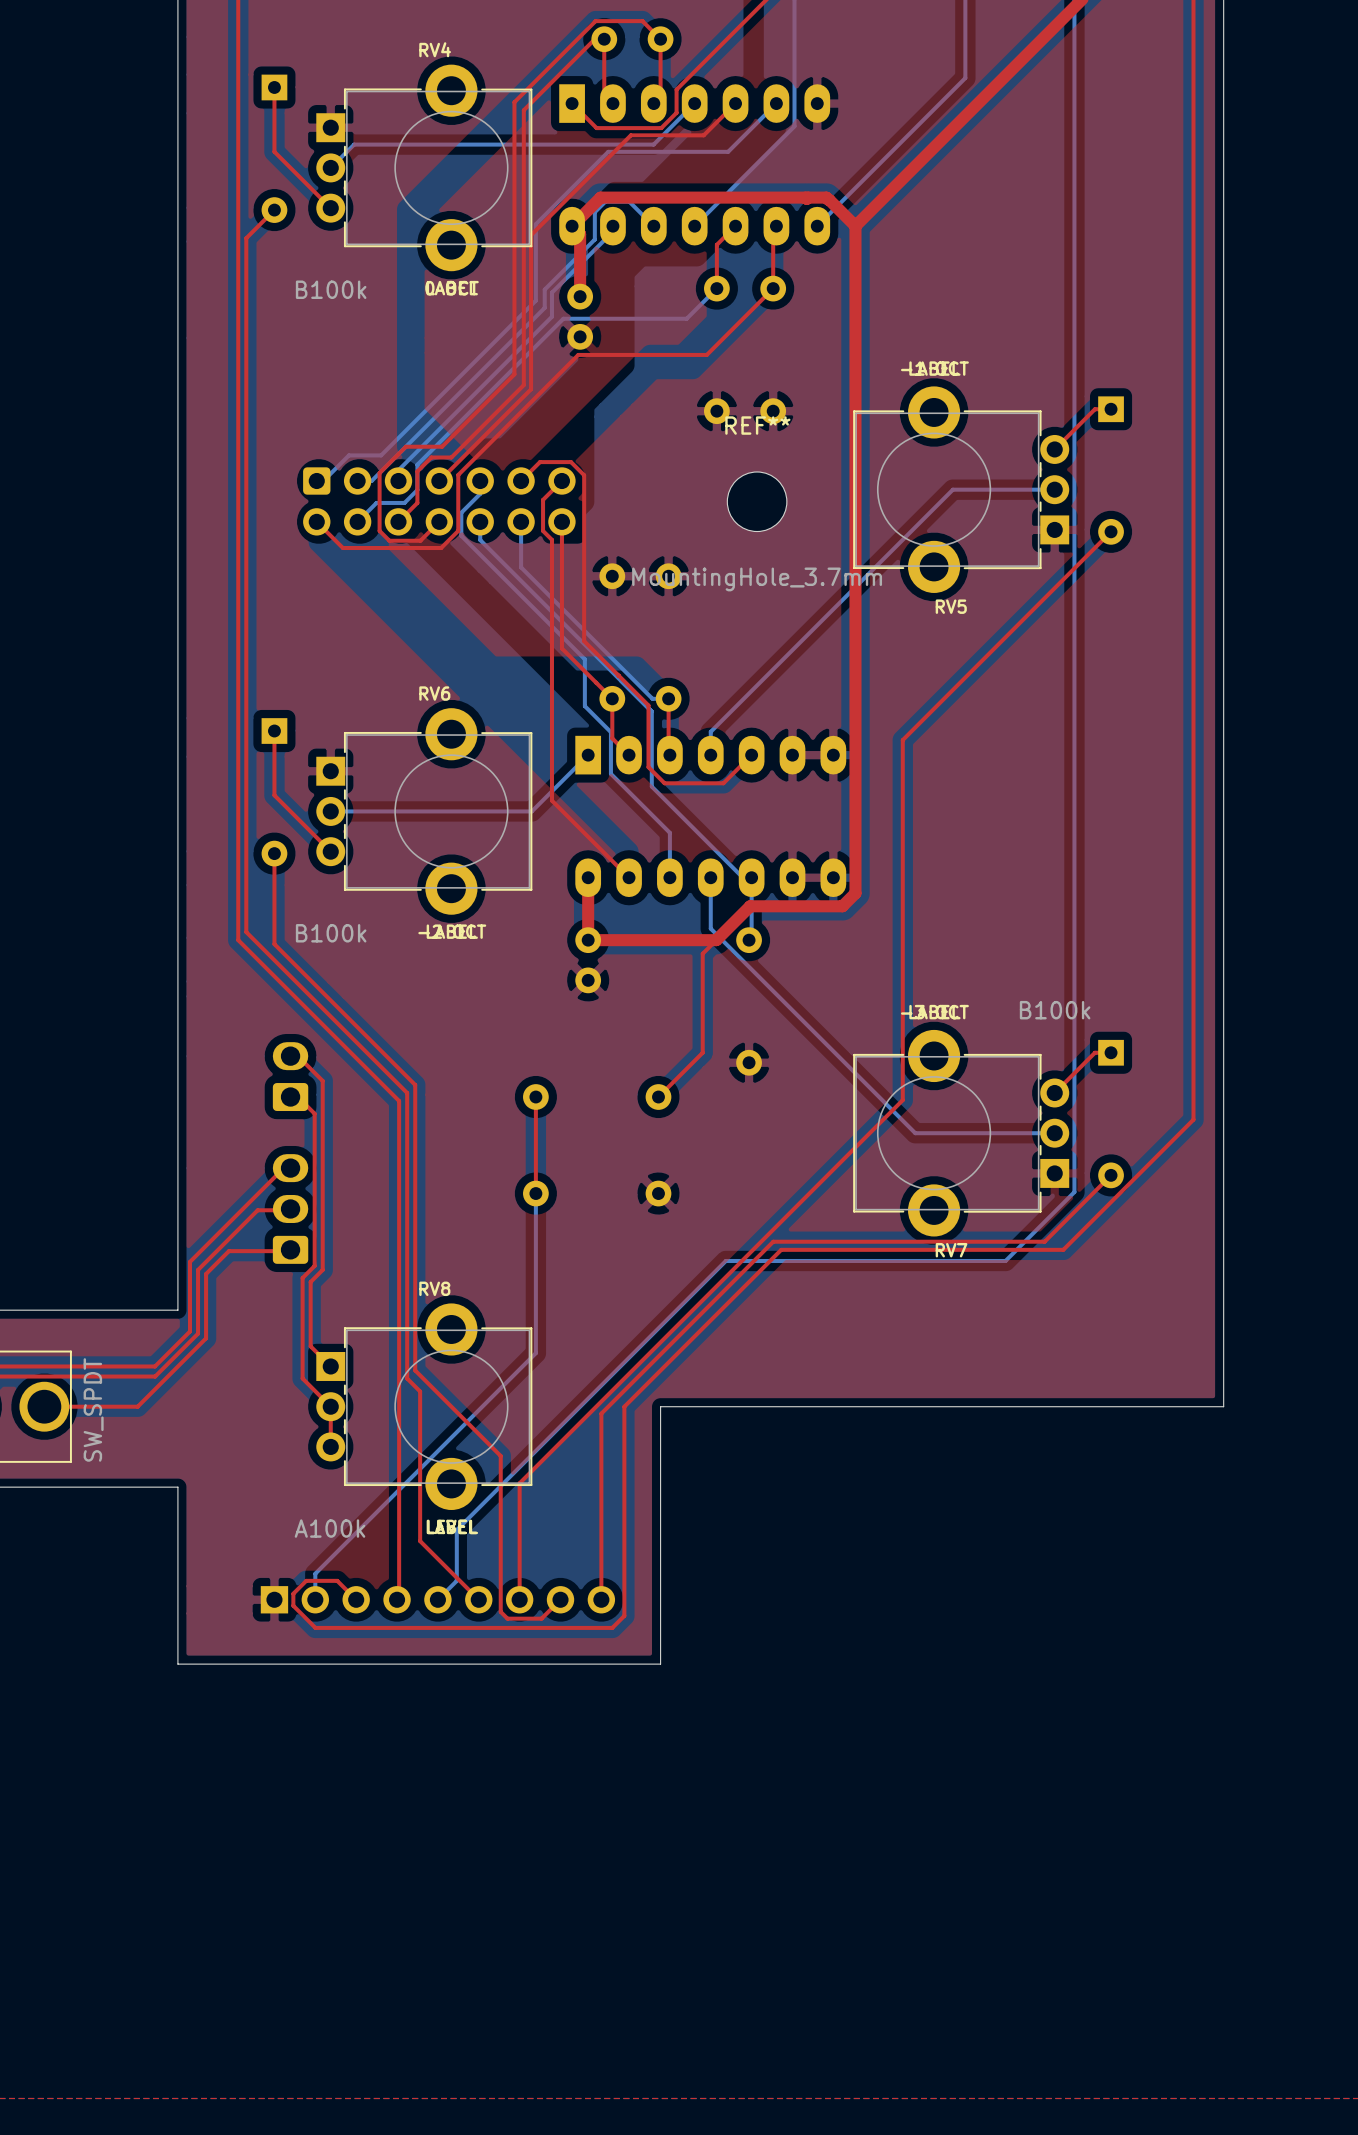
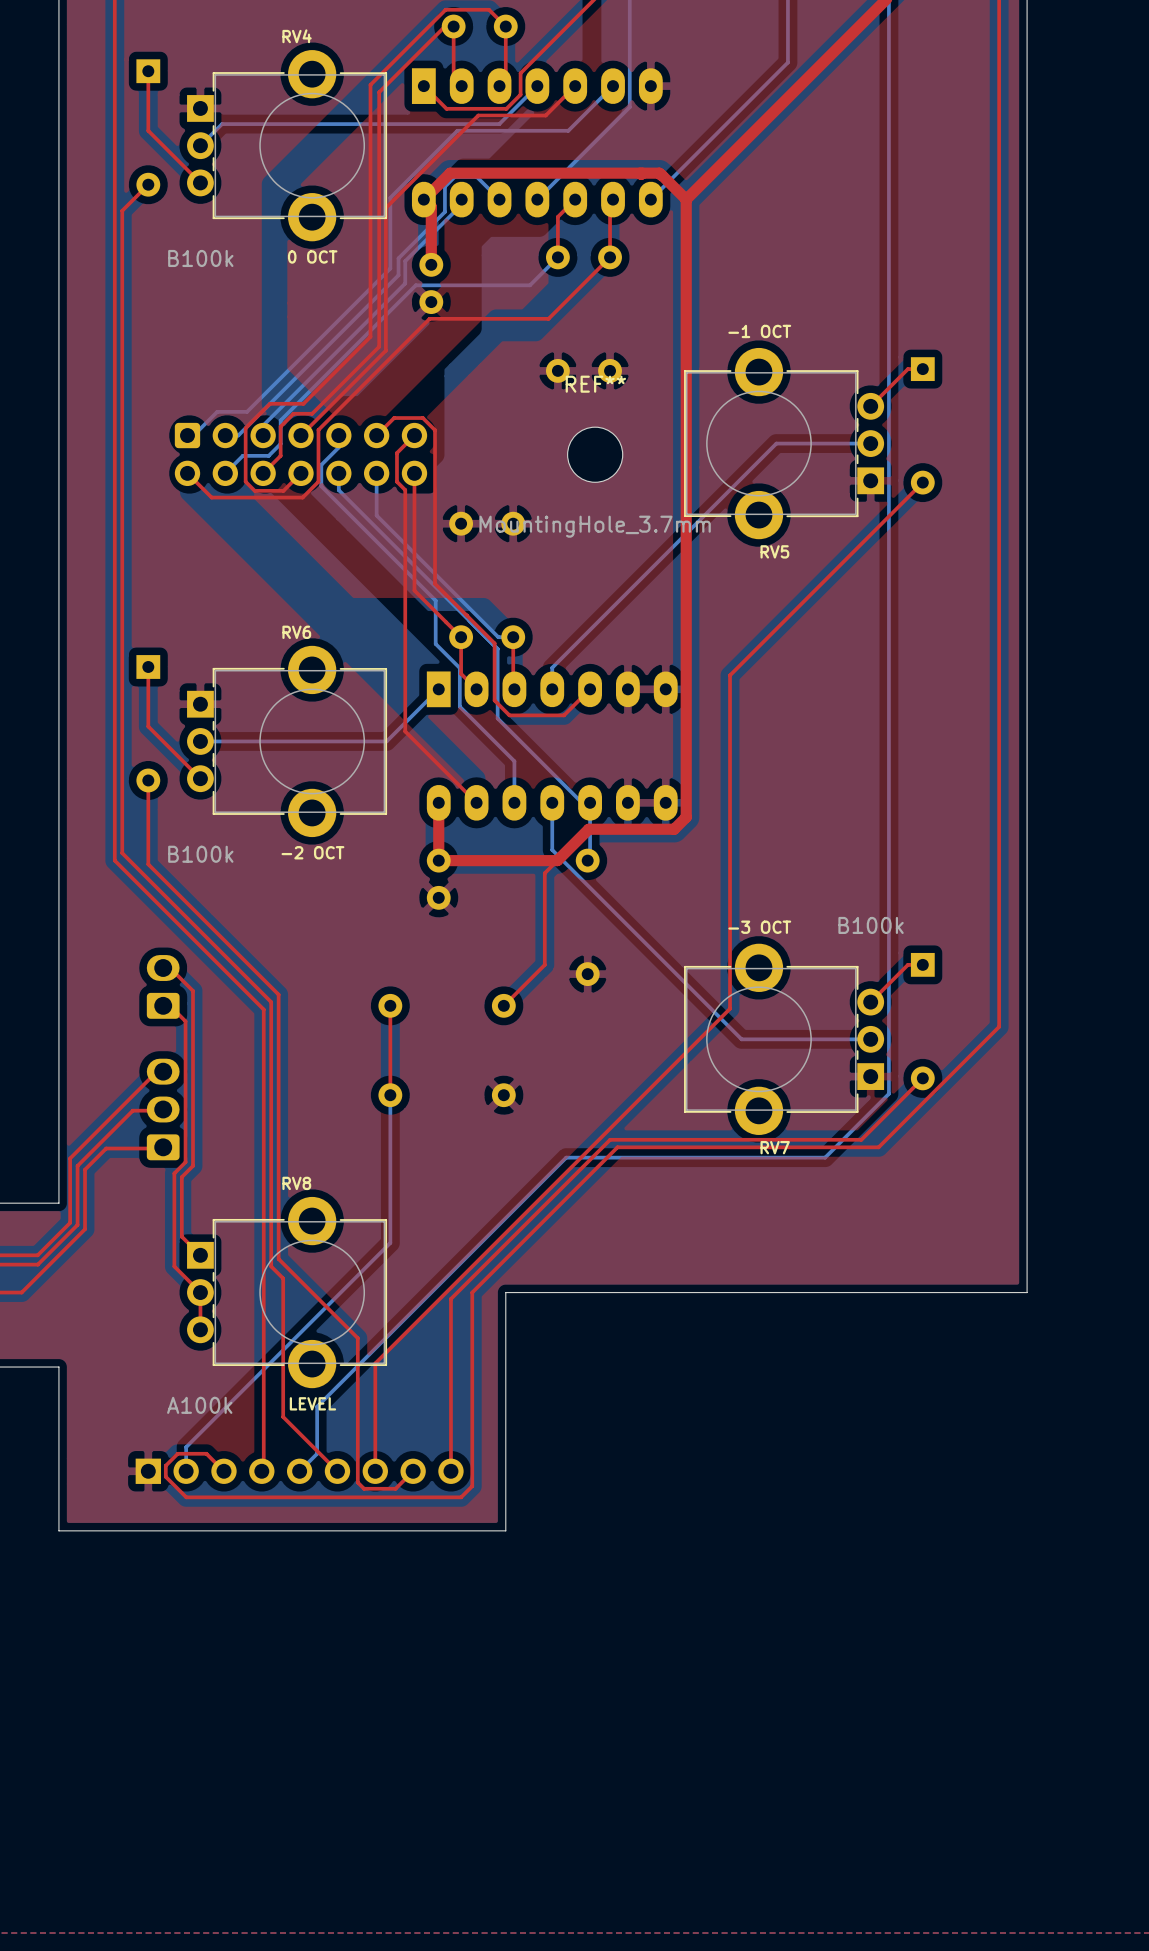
RV4 footprint: [316, 64, 533, 272] -> [187, 50, 388, 242]
RV5 footprint: [853, 386, 1070, 593] -> [684, 347, 885, 540]
RV6 footprint: [316, 708, 533, 915] -> [187, 645, 388, 838]
RV7 footprint: [853, 1029, 1070, 1237] -> [684, 943, 885, 1135]
RV8 footprint: [316, 1303, 533, 1510] -> [187, 1196, 388, 1389]

